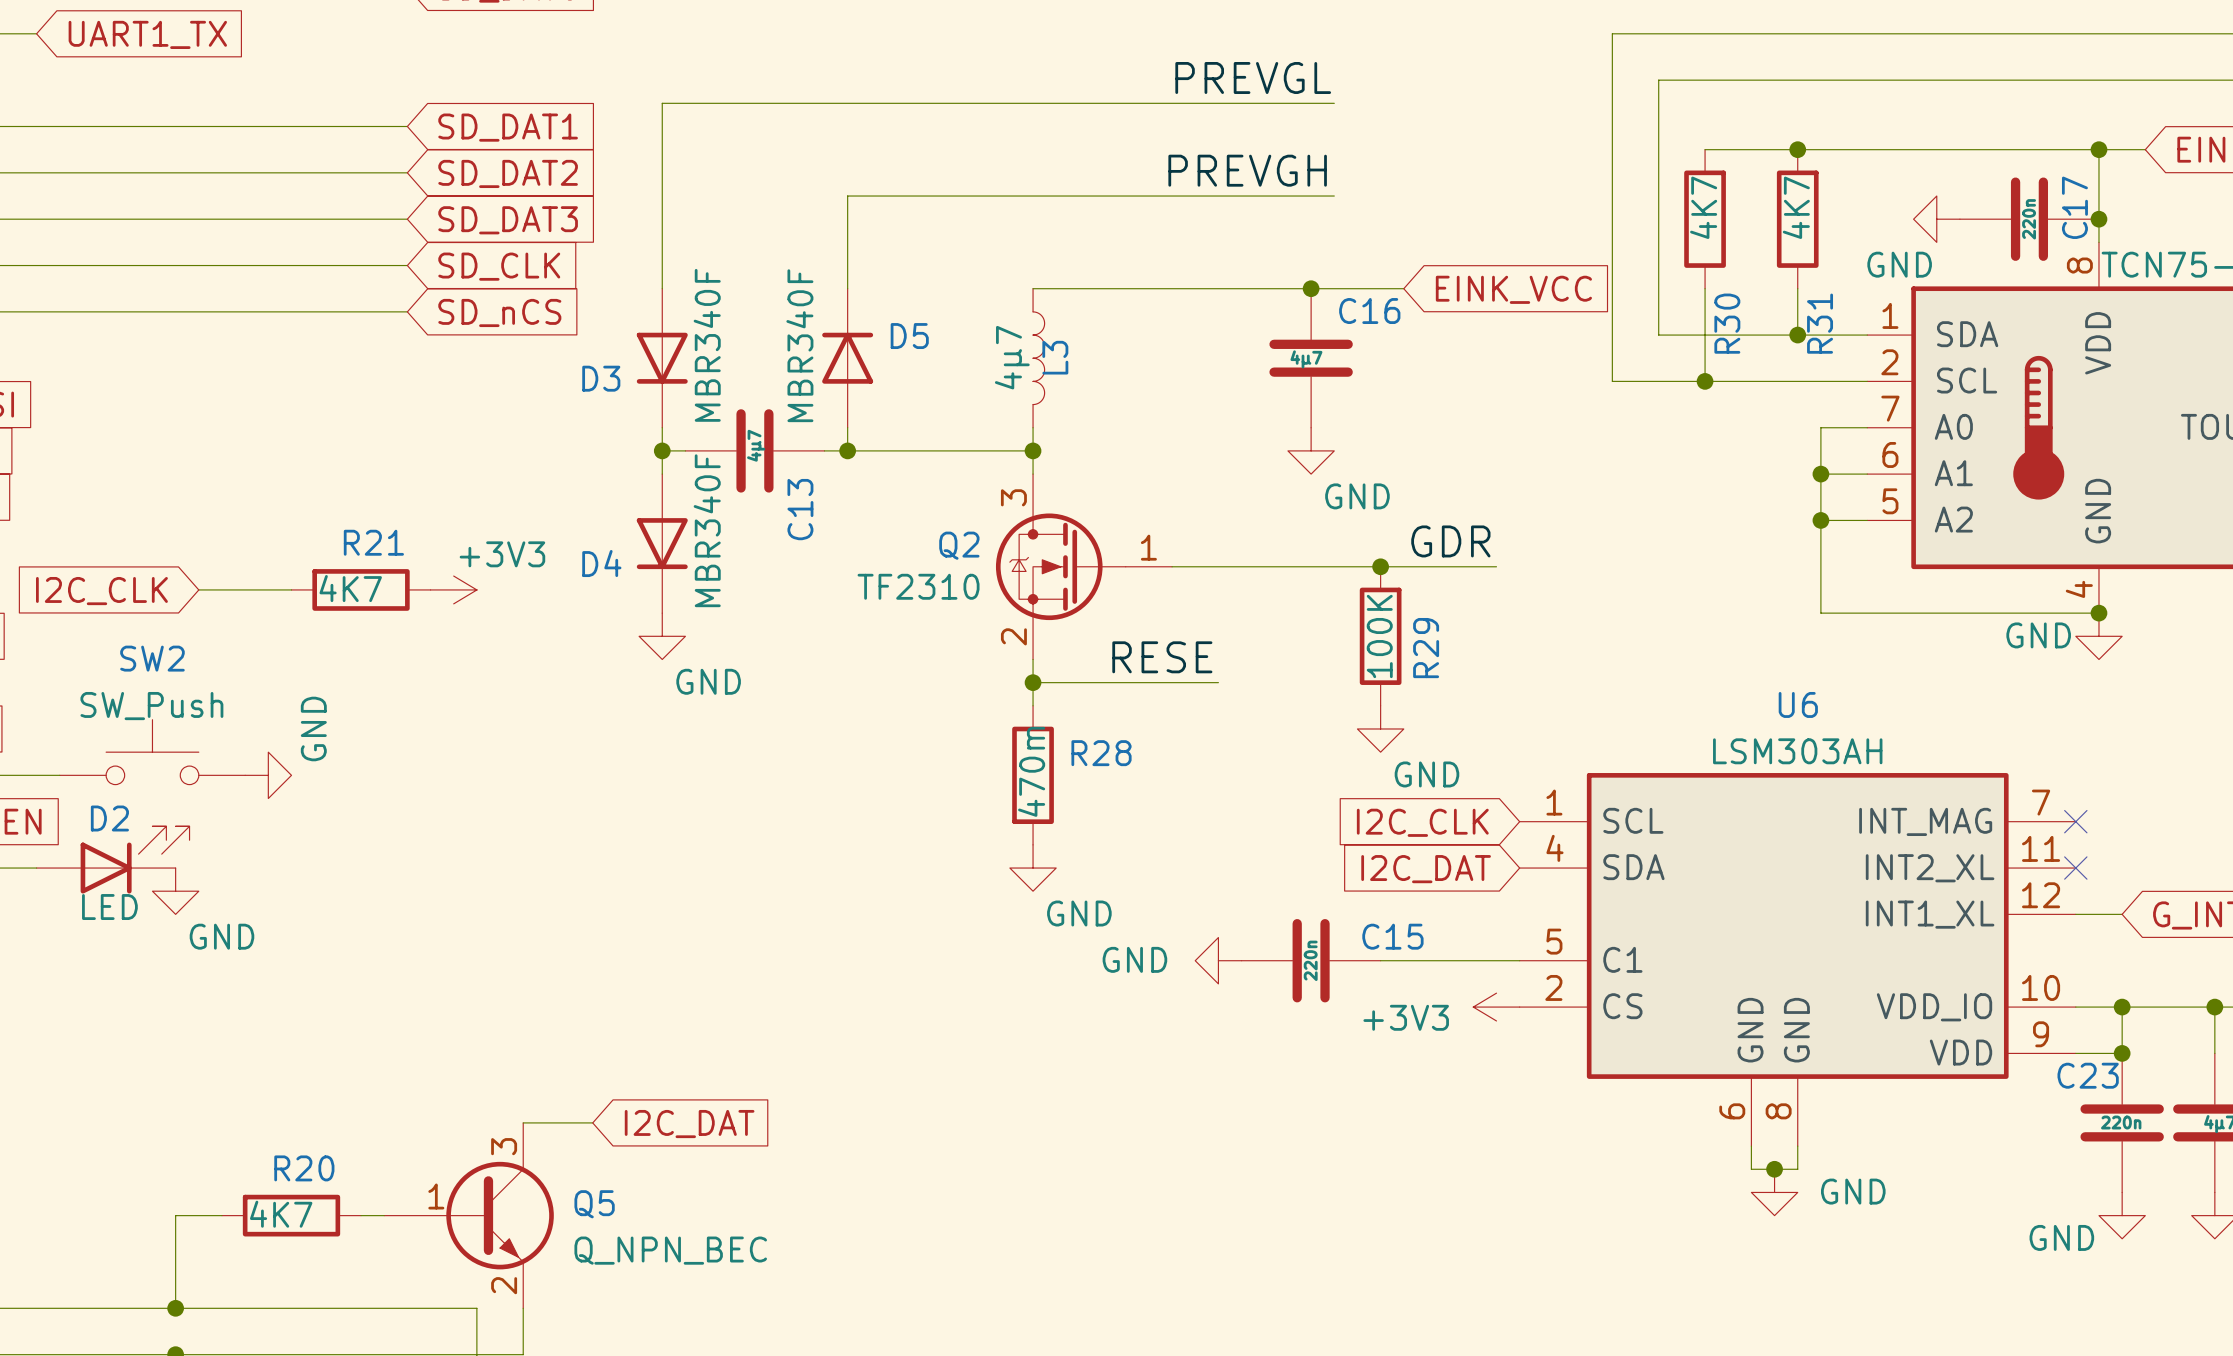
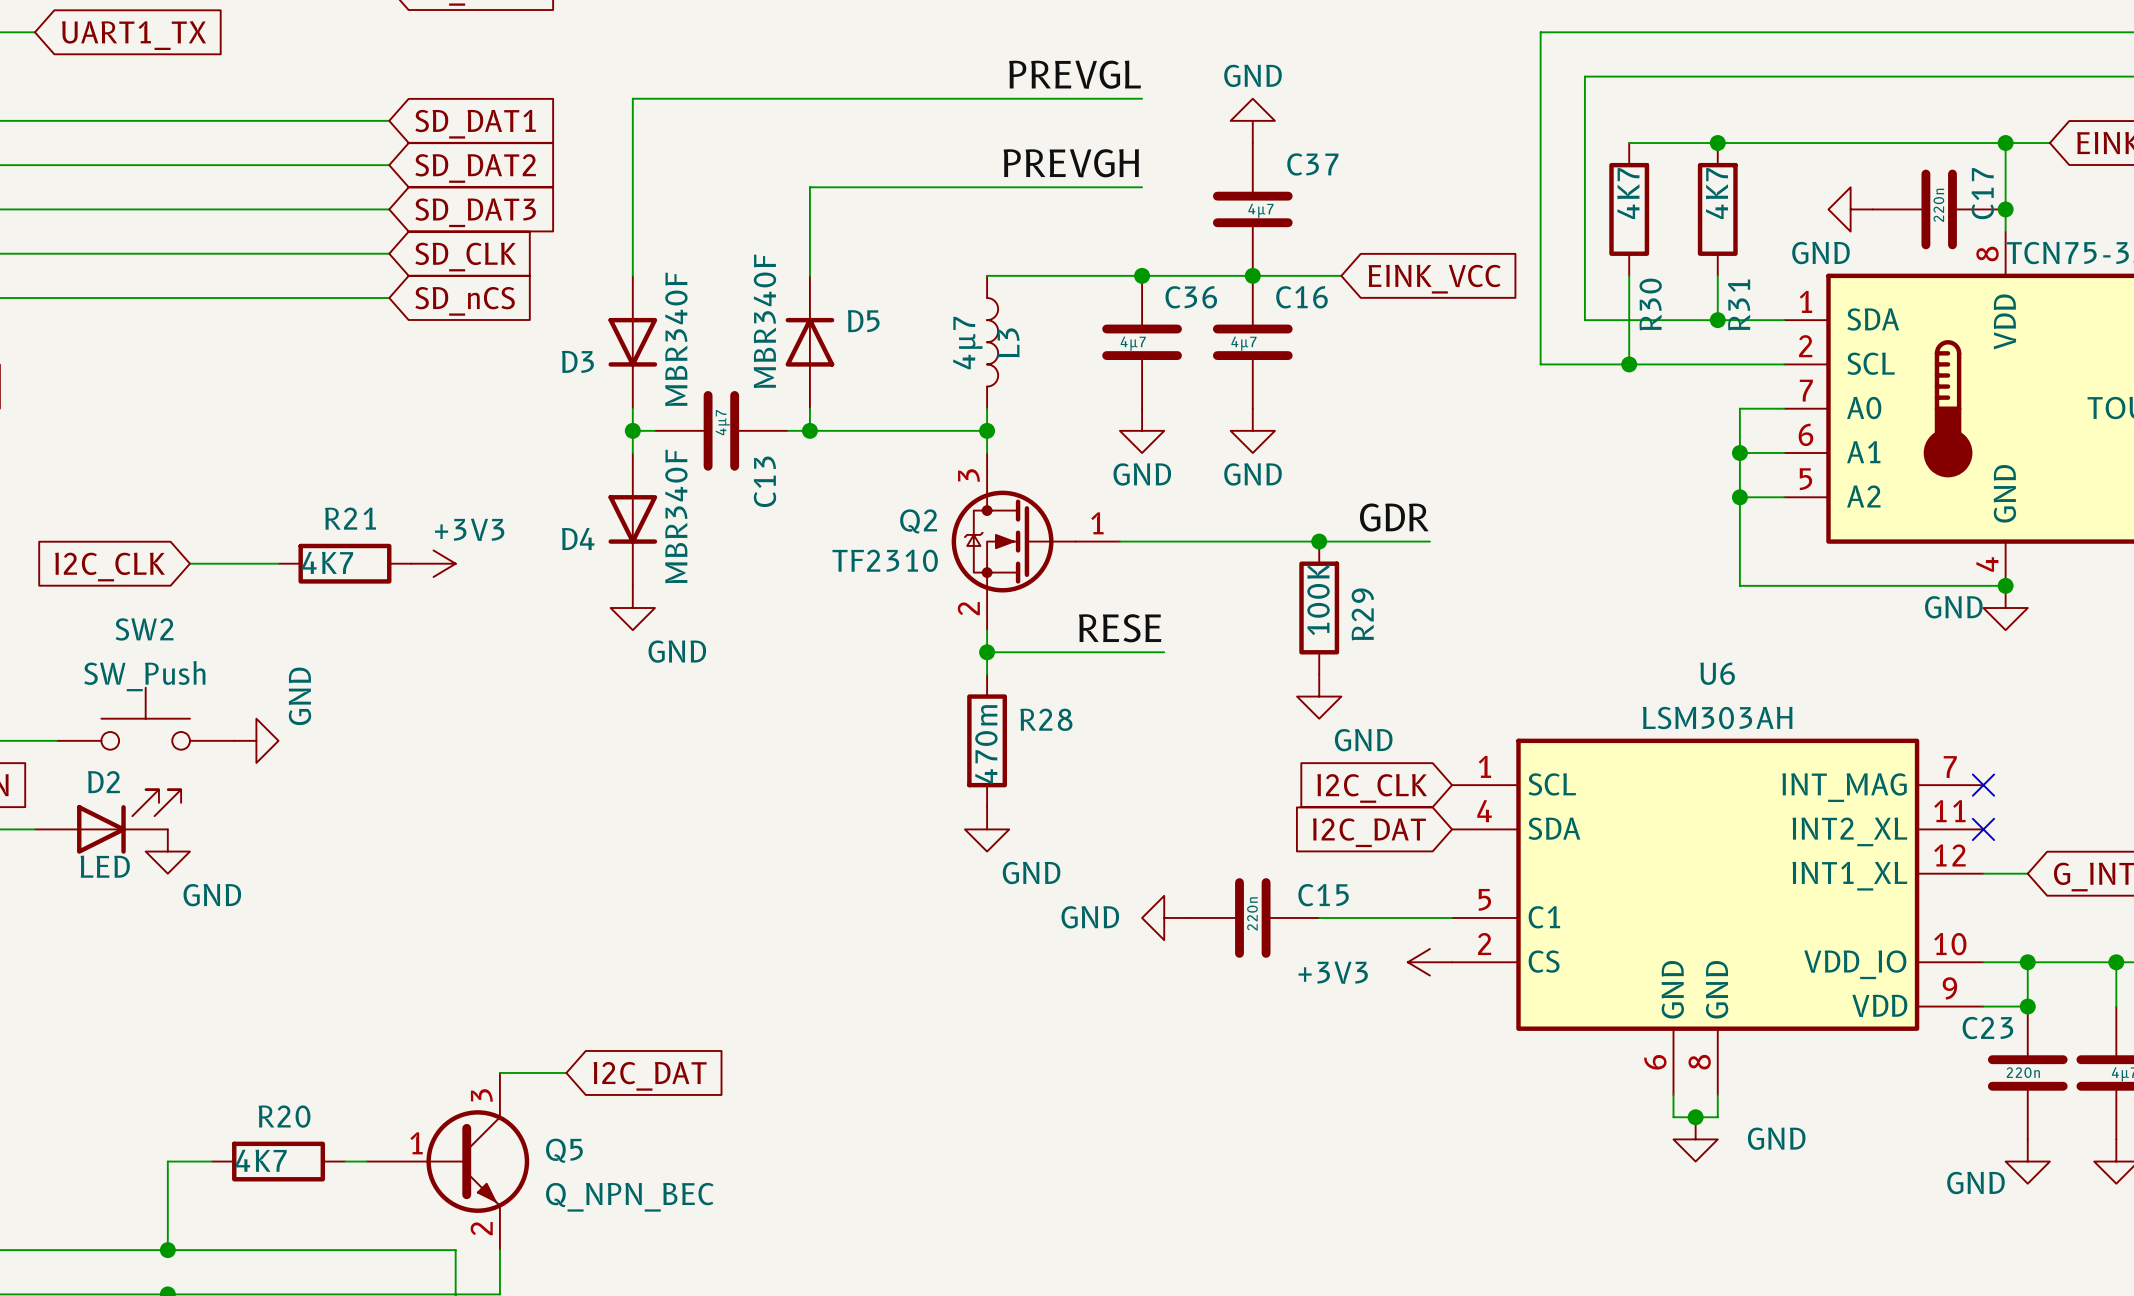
label position: PREVGL (1253, 77) -> PREVGL (1075, 74)
wire: (1195, 103) (1334, 103) -> none
power symbol: none -> GND (1252, 120)
label position: PREVGH (1247, 170) -> PREVGH (1071, 163)
wire: (1195, 196) (1334, 196) -> none
C37: none -> 4µ7 (1252, 209)
junction: none -> (1142, 275)
C36: none -> 4µ7 (1142, 342)
power symbol: none -> GND (1142, 430)
power symbol text position: GND (1357, 496) -> GND (1252, 474)

